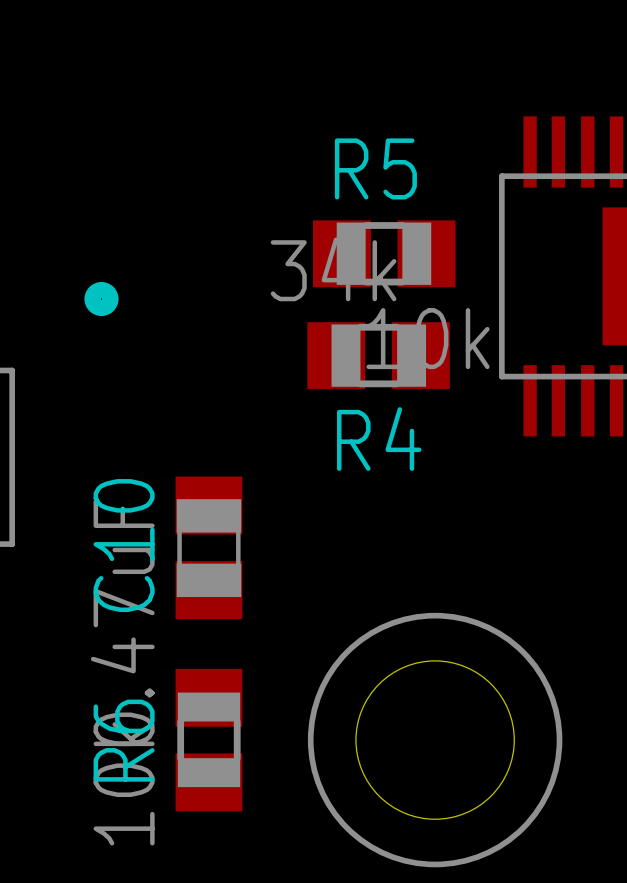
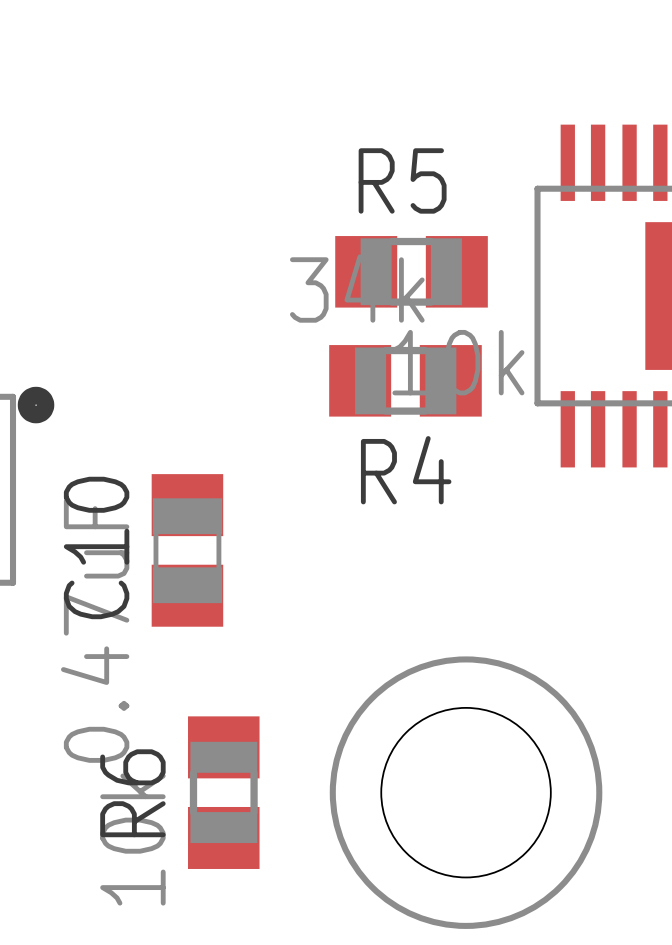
drawing position: (101, 299) -> (36, 405)
C10 position: (208, 547) -> (187, 550)

